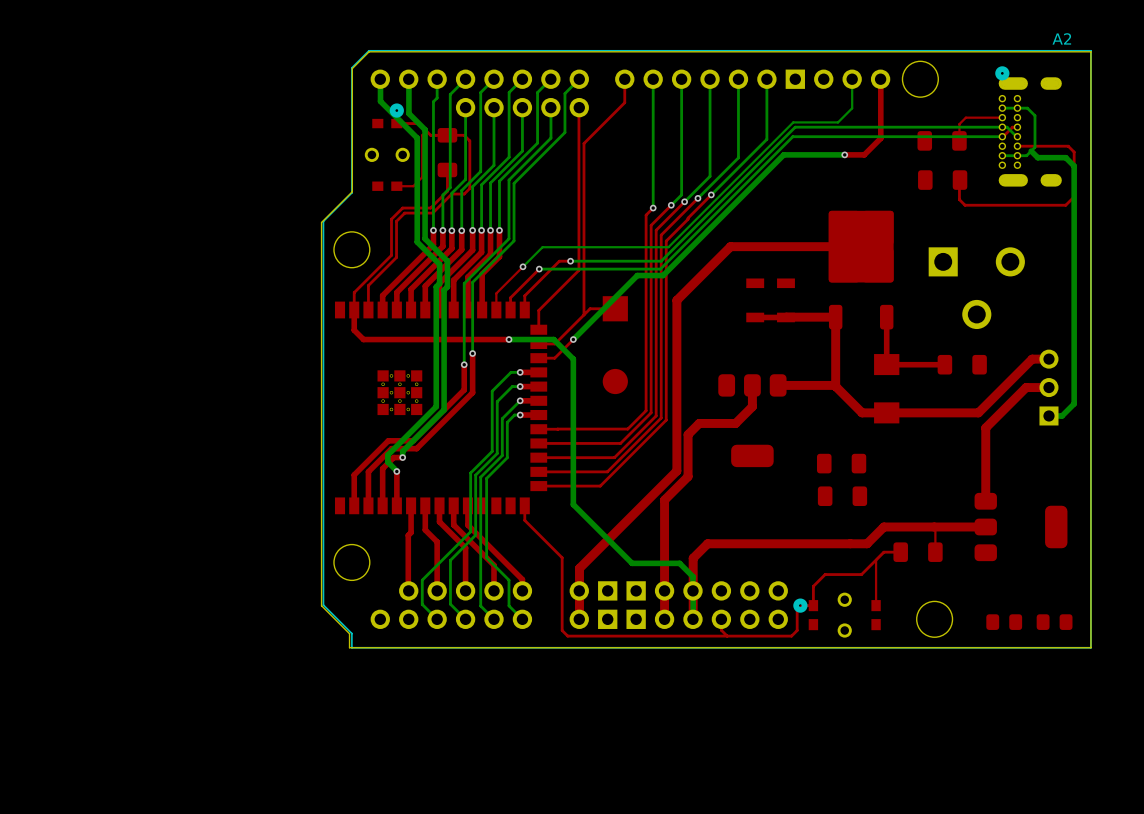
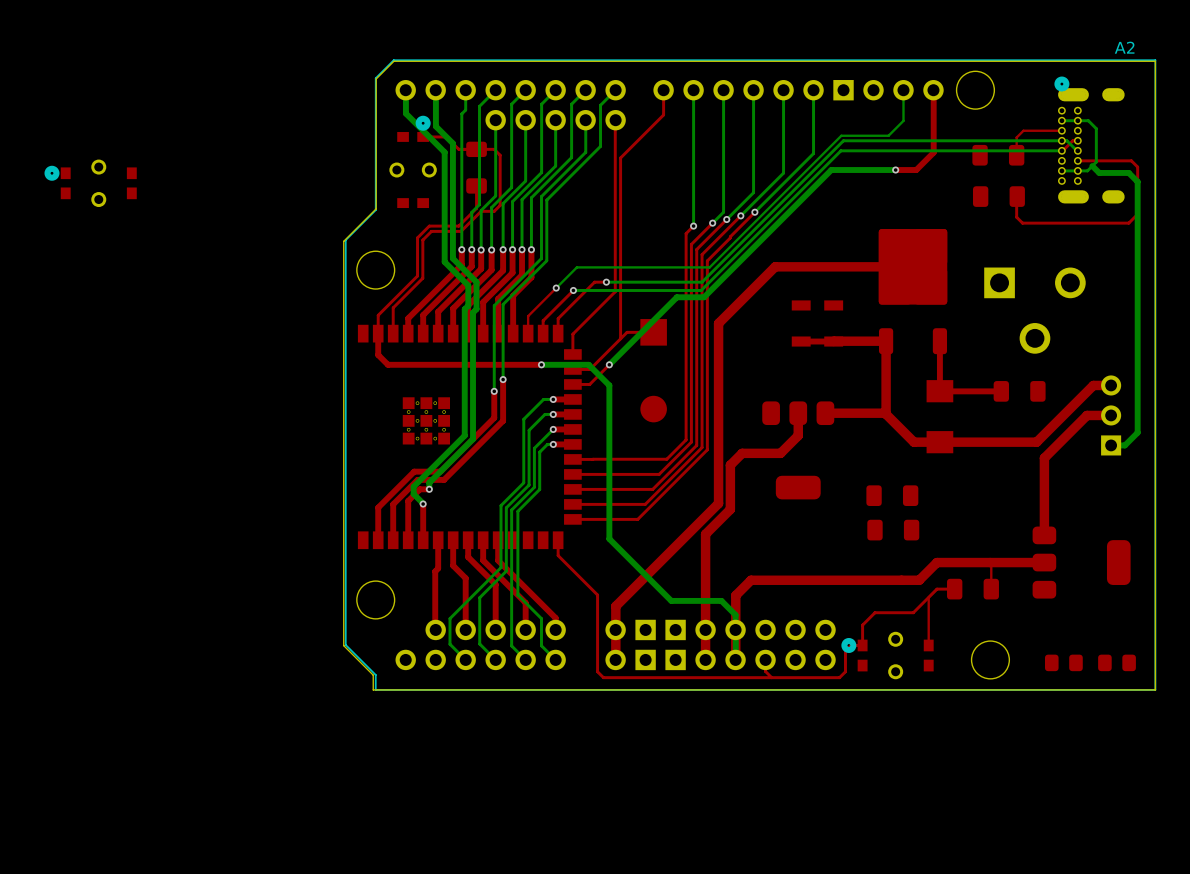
top track: (426, 131) (422, 135) (422, 177) (413, 186) (396, 186) -> none
part: none -> (90, 183)

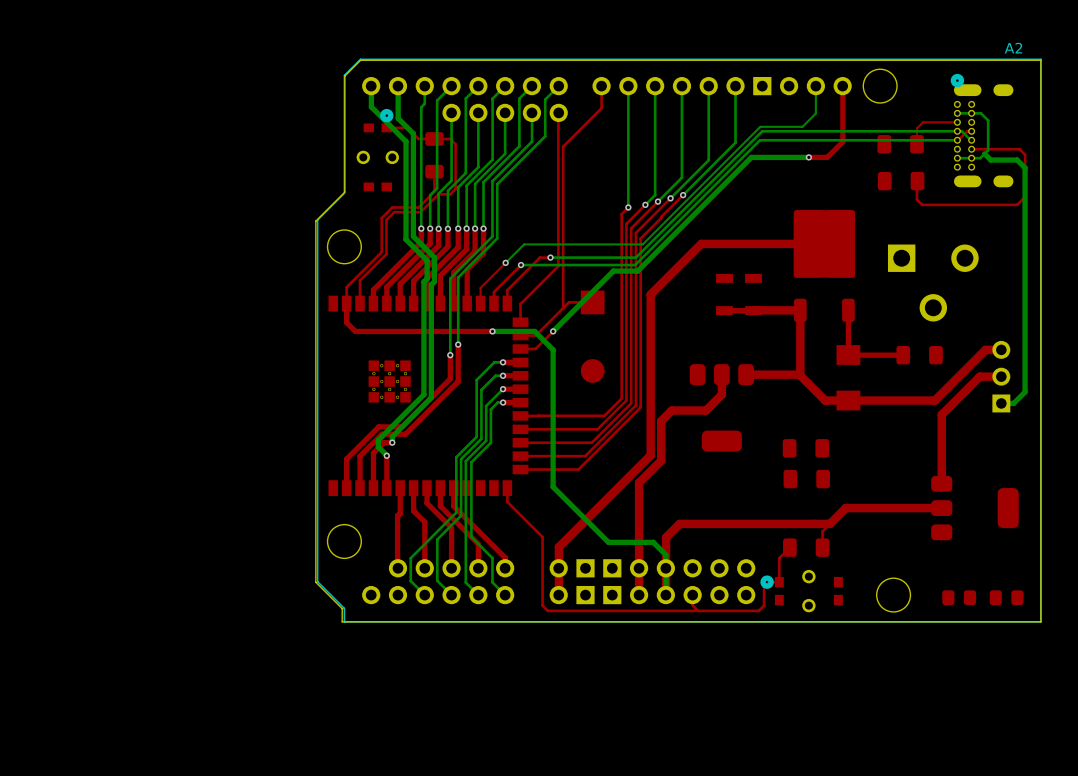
part: (90, 183) -> none
top track: (990, 562) (991, 589) -> none
top track: none -> (829, 523) (822, 531) (822, 547)
top track: (936, 589) (913, 612) (874, 612) (862, 625) -> (789, 547) (779, 558) (779, 563)
top track: (936, 589) (928, 597) (928, 645) -> none
top track: (954, 589) (936, 589) -> none
part position: (972, 589) -> (806, 547)

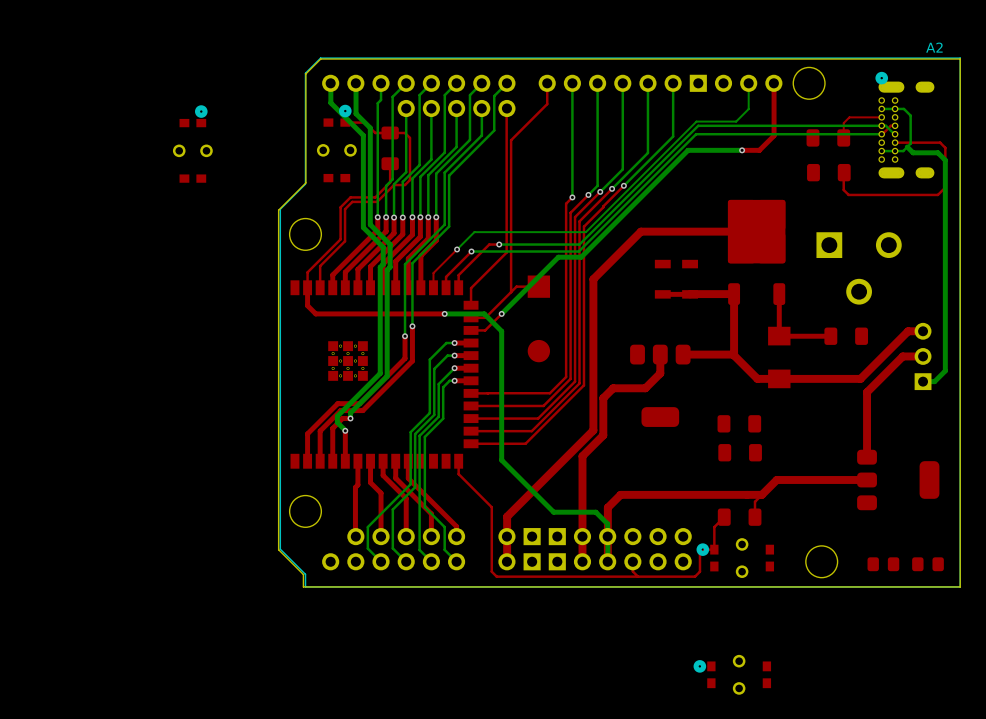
part: none -> (192, 144)
part: none -> (732, 674)

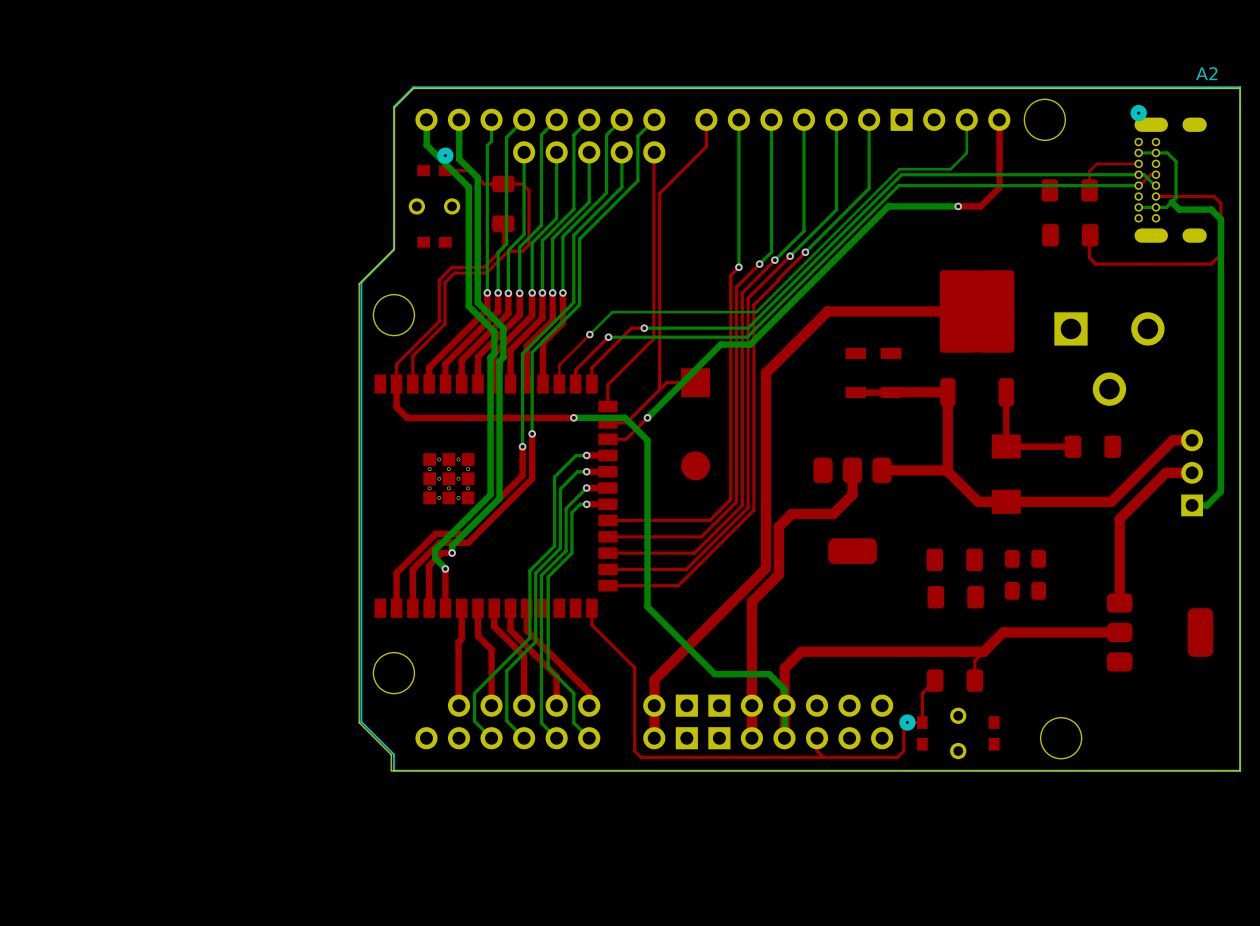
part: (192, 144) -> none
part: none -> (1025, 558)
part: none -> (1025, 590)
part: (883, 564) -> none
part: (928, 564) -> none
part: (732, 674) -> none

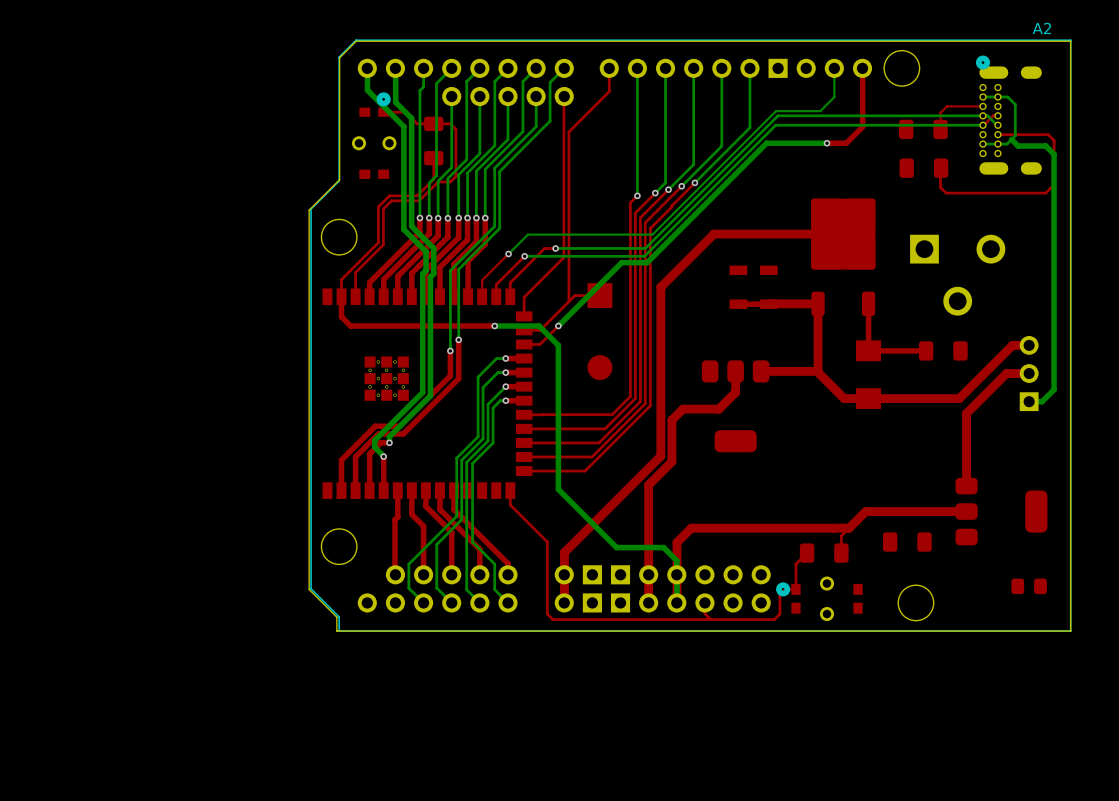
part: (1025, 558) -> none
part: (954, 559) -> none
part: (1025, 590) -> none
part: (955, 597) -> none
part: none -> (907, 542)
part: none -> (1029, 586)

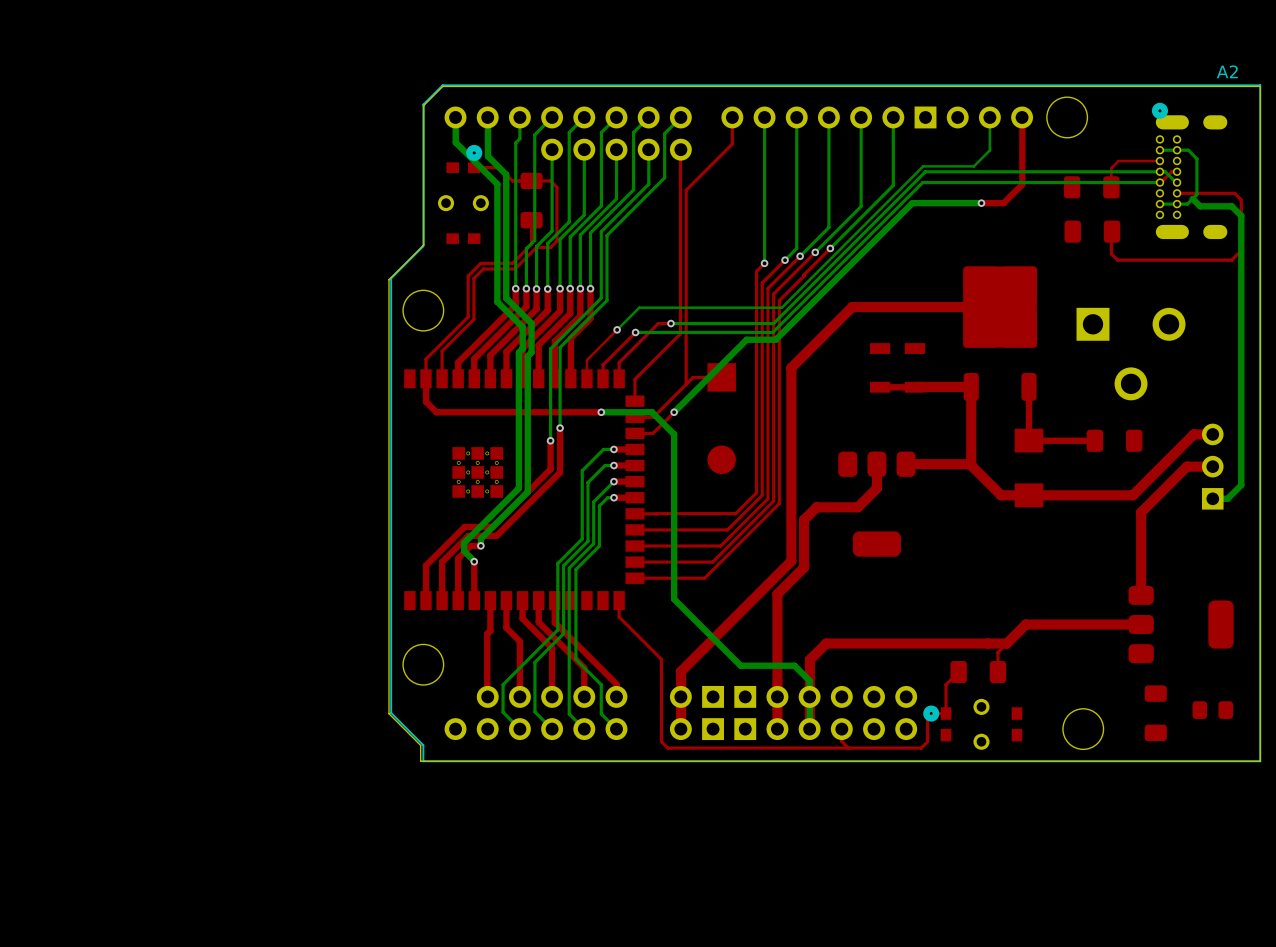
part rotation: 0° (907, 542) -> 90° clockwise (1155, 713)
part position: (907, 542) -> (1155, 713)

